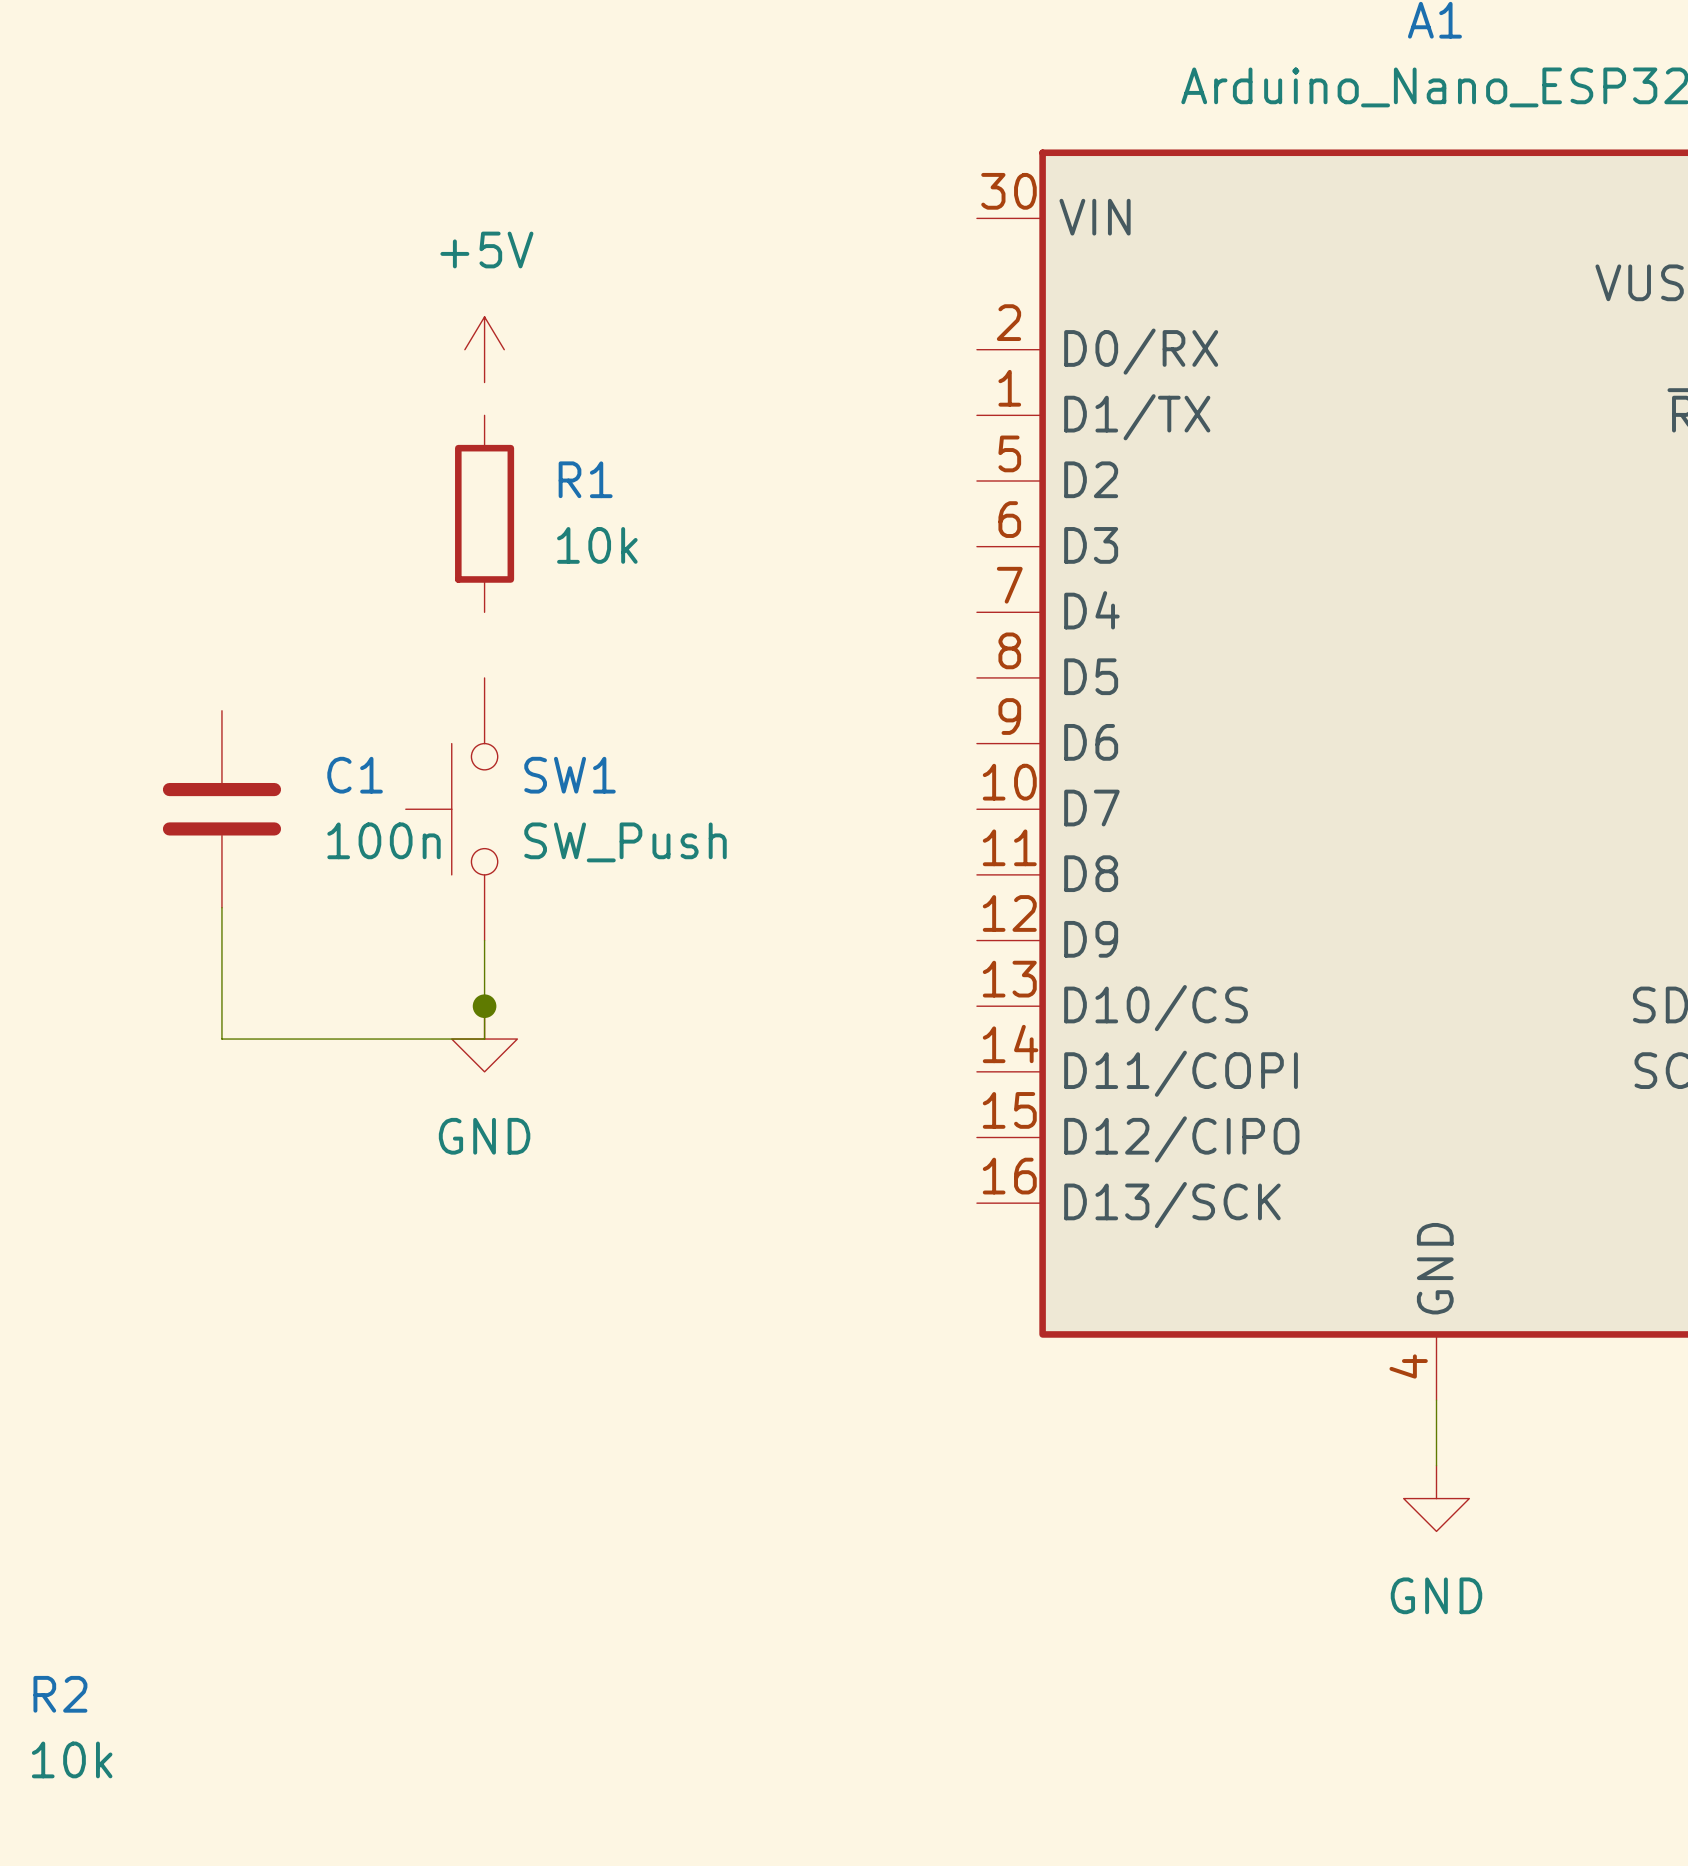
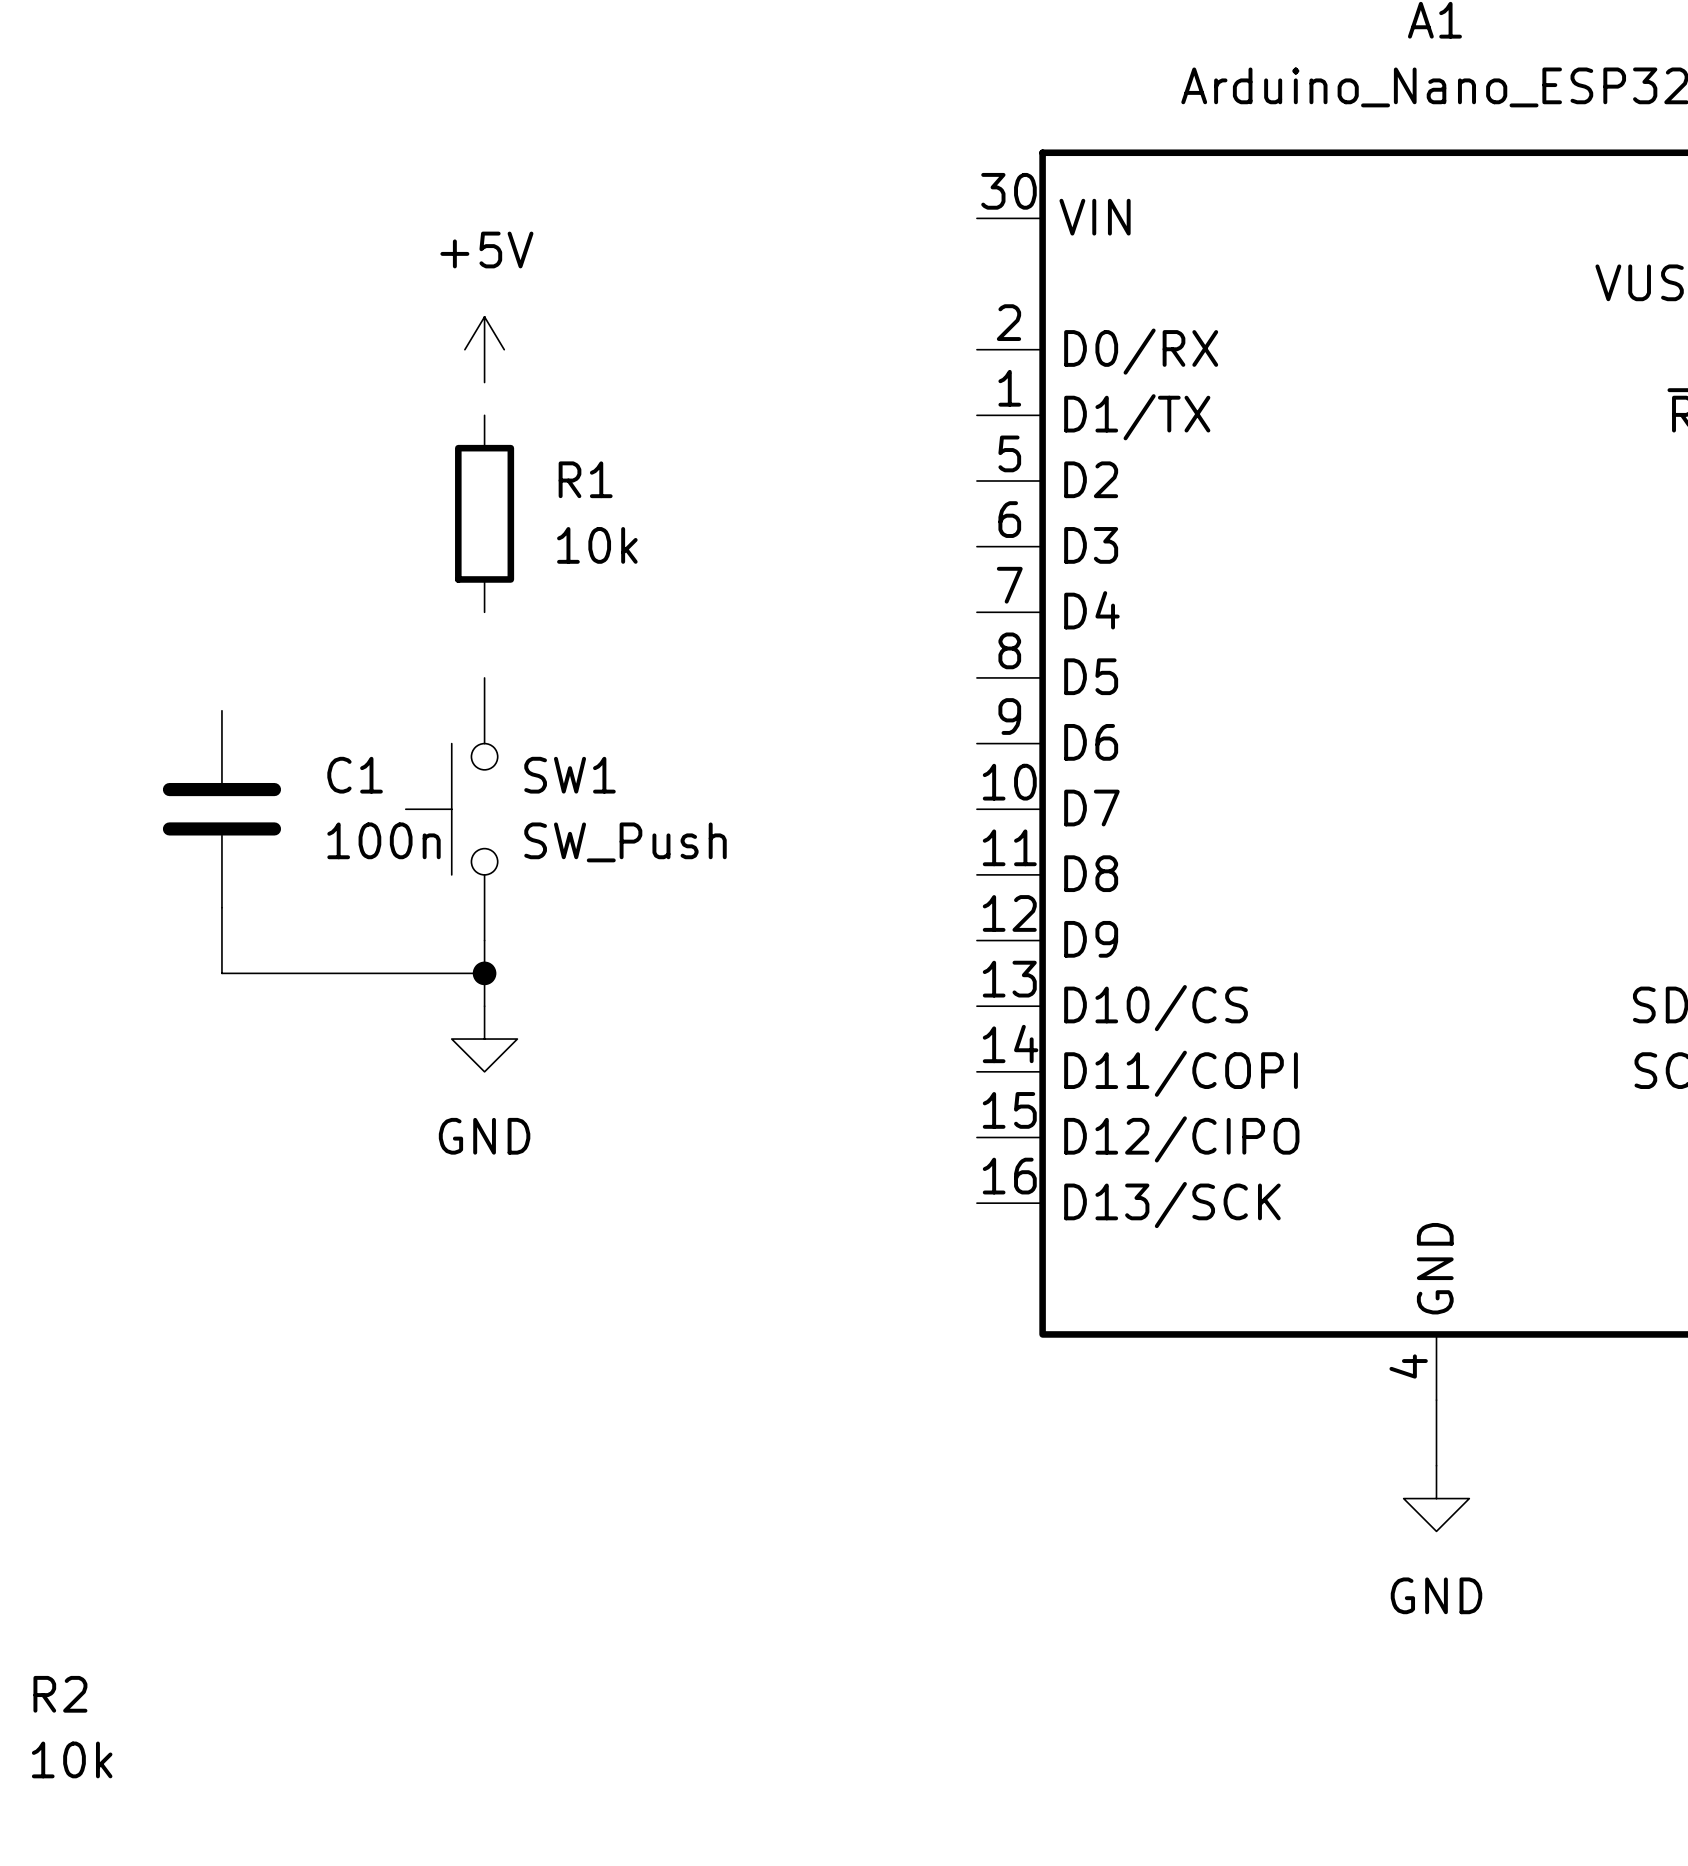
wire: (221, 973) (221, 1039) (484, 1039) (484, 1006) -> (221, 973) (484, 973)
junction position: (484, 1006) -> (484, 973)

